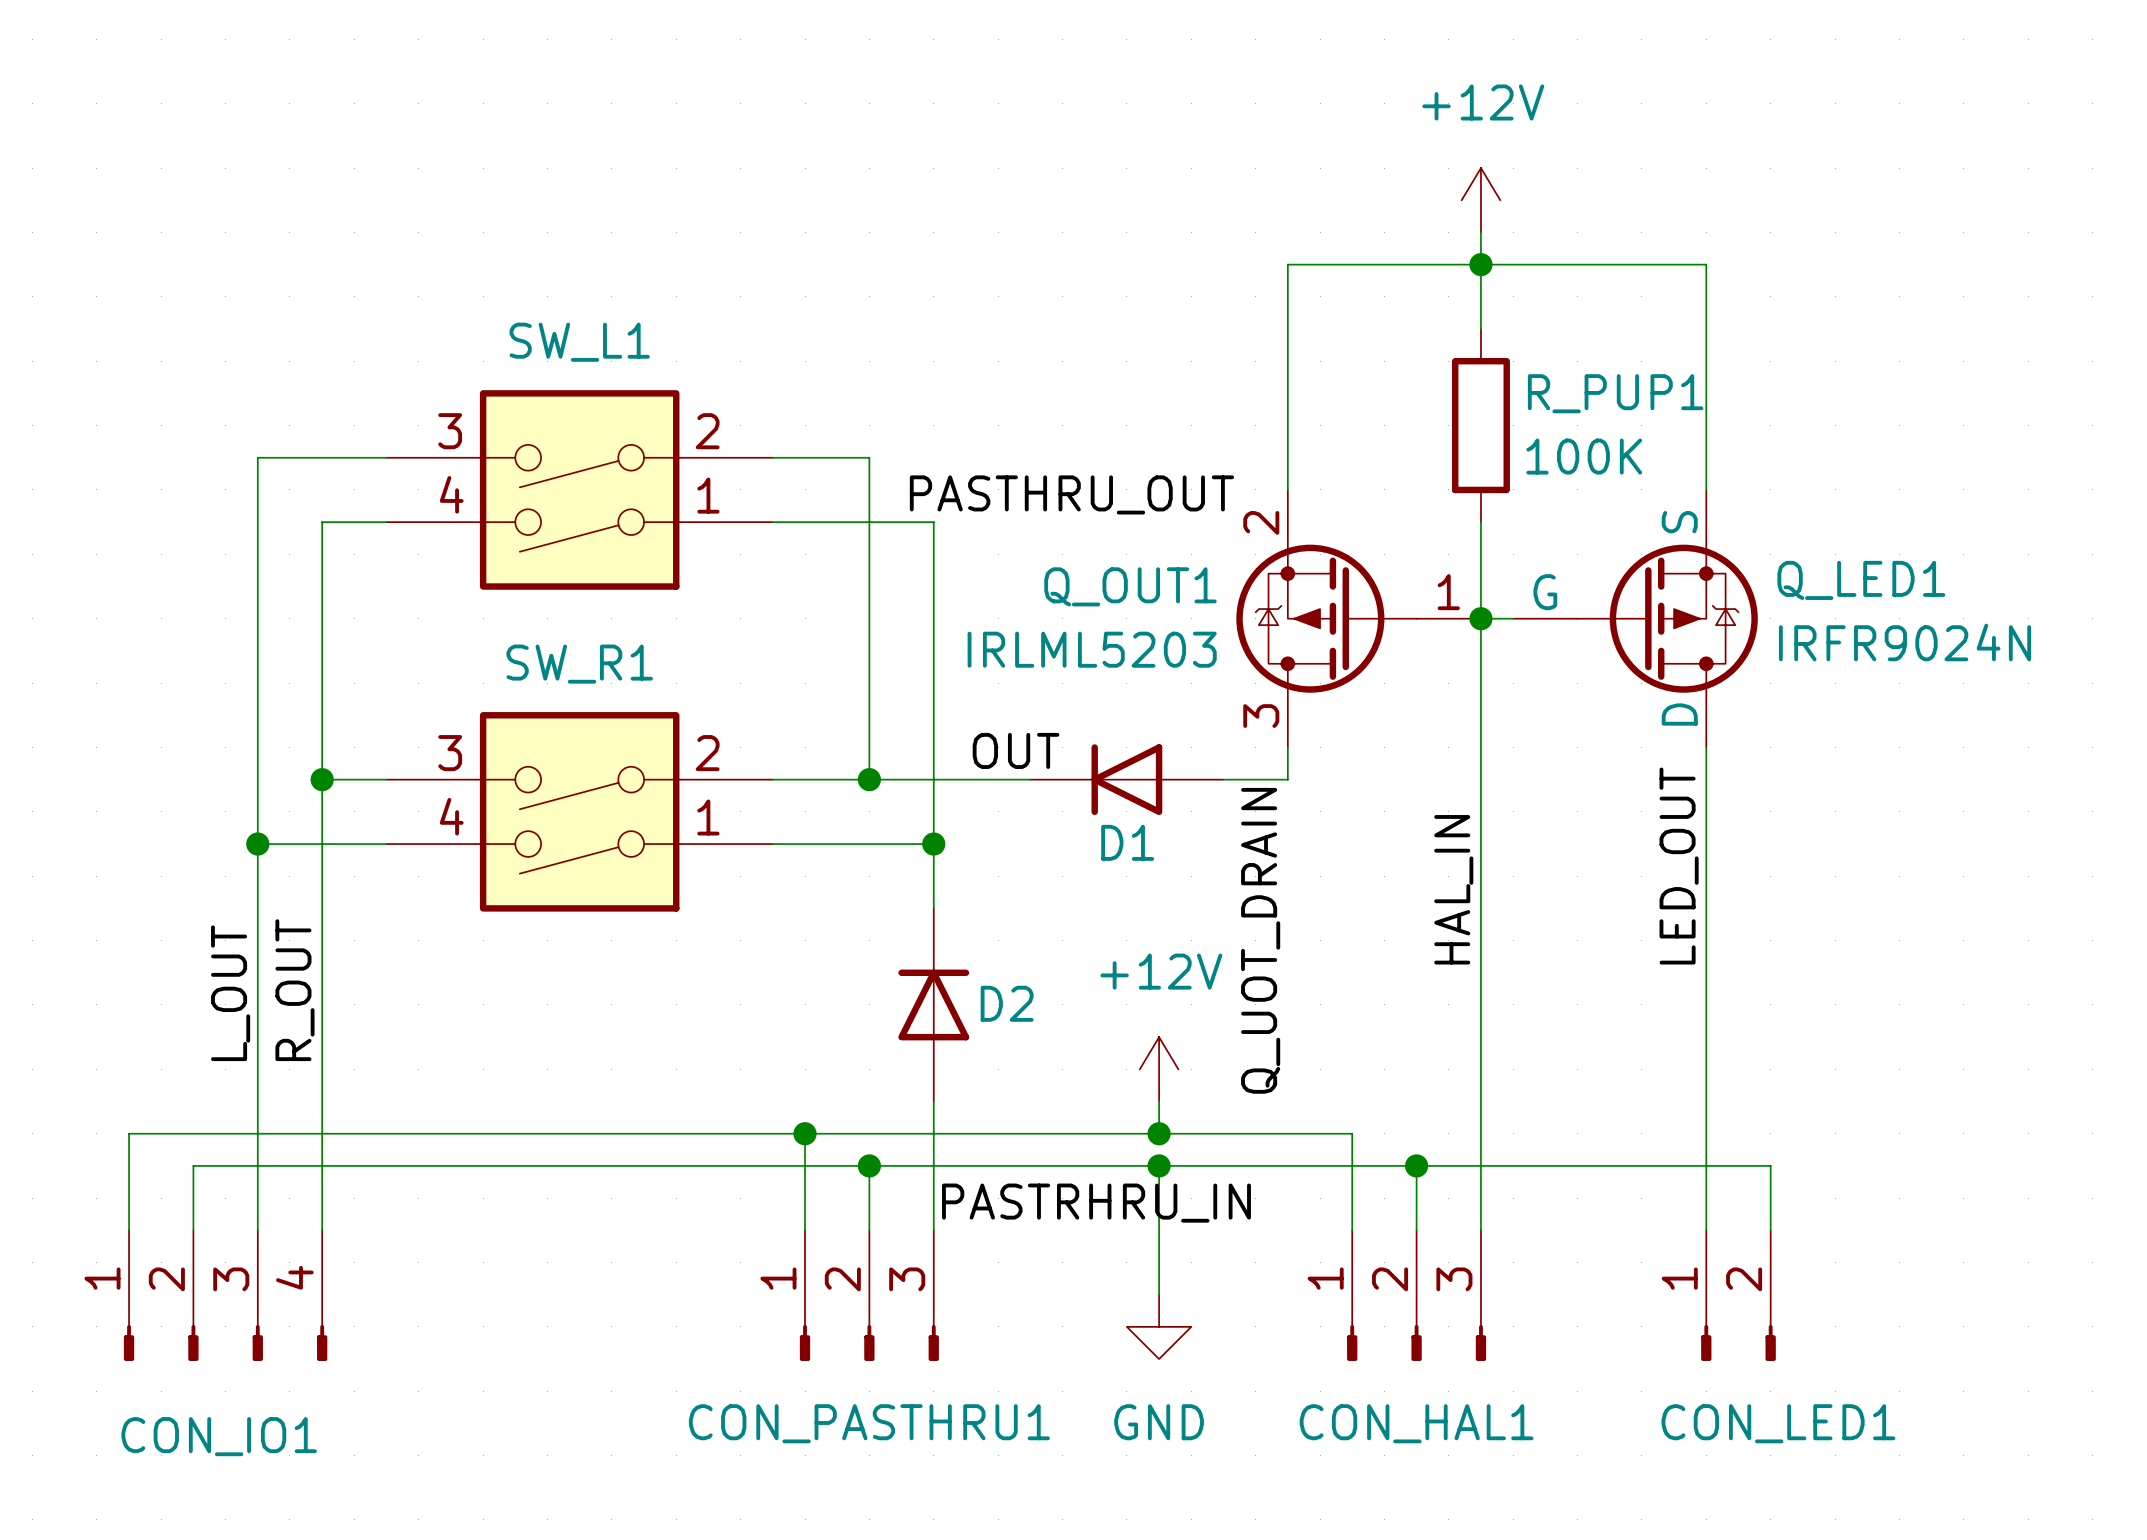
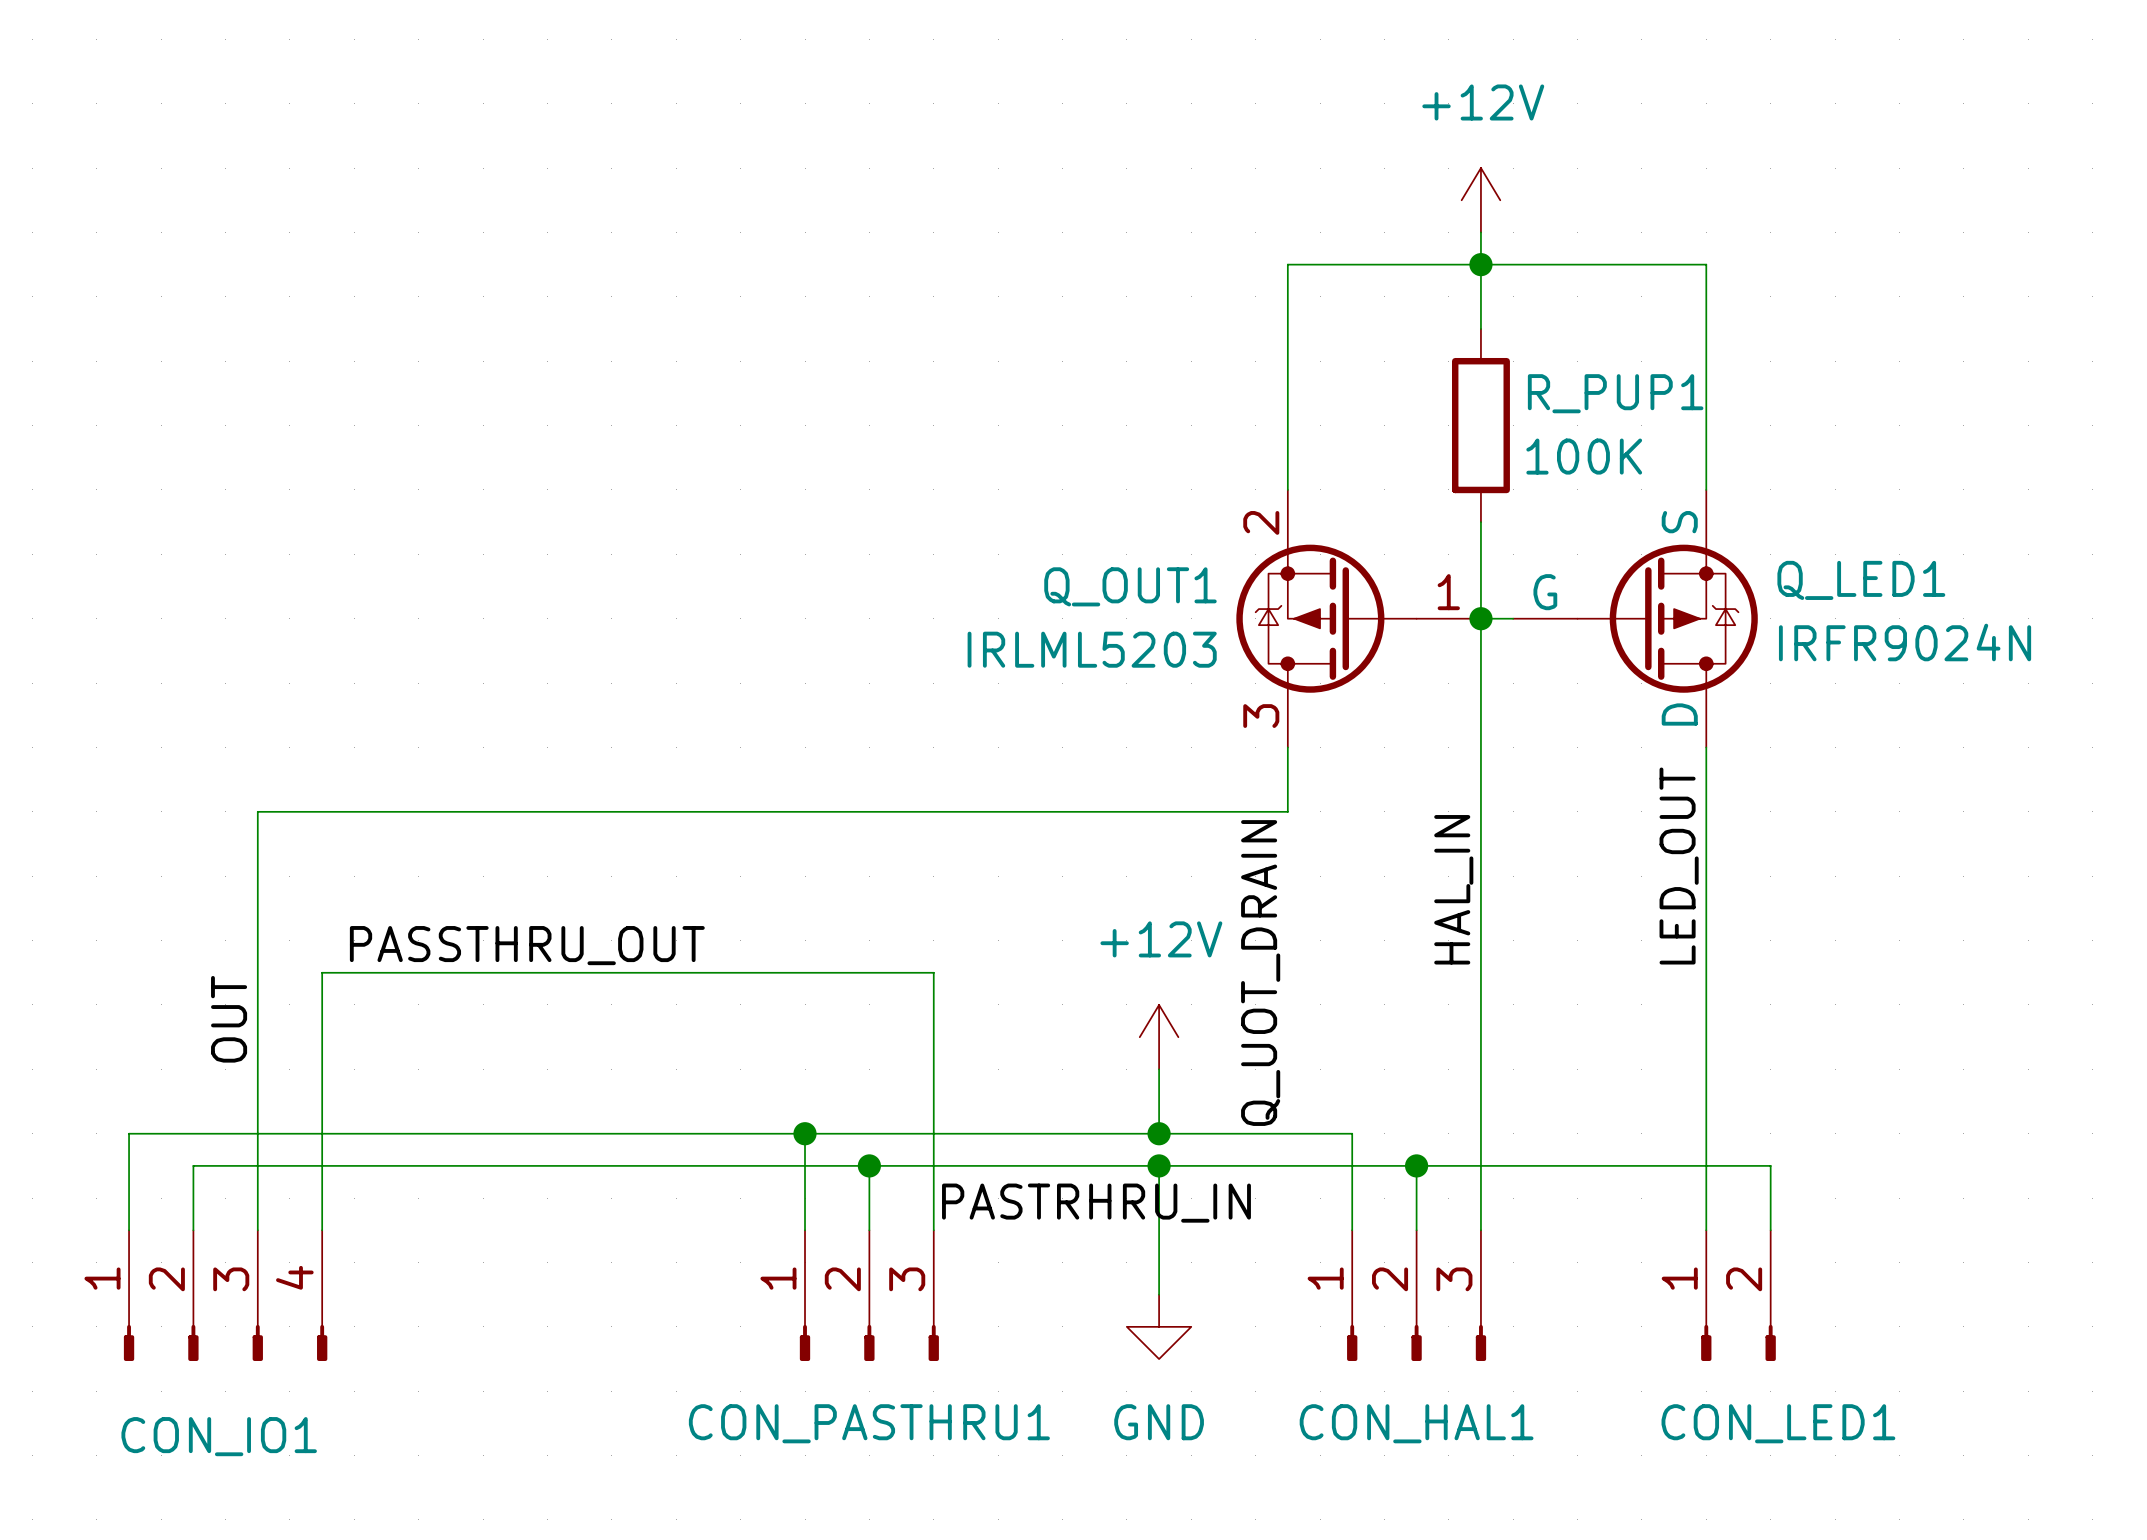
wire: (386, 457) (257, 457) (257, 811) -> (1287, 779) (1287, 811) (257, 811)
wire: (772, 457) (869, 457) (869, 779) -> none
SW_L1: (579, 489) -> none
label: PASTHRU_OUT (1071, 494) -> none
wire: (386, 522) (322, 522) (322, 972) -> (933, 1101) (933, 972) (322, 972)
wire: (772, 522) (933, 522) (933, 908) -> none
label: OUT (1016, 750) -> none
wire: (322, 779) (386, 779) -> none
junction: (322, 779) -> none
wire: (772, 779) (1030, 779) -> none
junction: (869, 779) -> none
D1: (1126, 779) -> none
wire: (1223, 779) (1287, 779) -> none
SW_R1: (579, 811) -> none
wire: (257, 844) (386, 844) -> none
junction: (257, 844) -> none
wire: (772, 844) (933, 844) -> none
junction: (933, 844) -> none
label position: Q_UOT_DRAIN (1260, 940) -> Q_UOT_DRAIN (1260, 973)
label: none -> PASSTHRU_OUT (527, 945)
label: R_OUT (294, 990) -> none
label: L_OUT (230, 993) -> OUT (229, 1019)
D2: (933, 1004) -> none
power symbol position: +12V (1159, 1069) -> +12V (1159, 1037)

